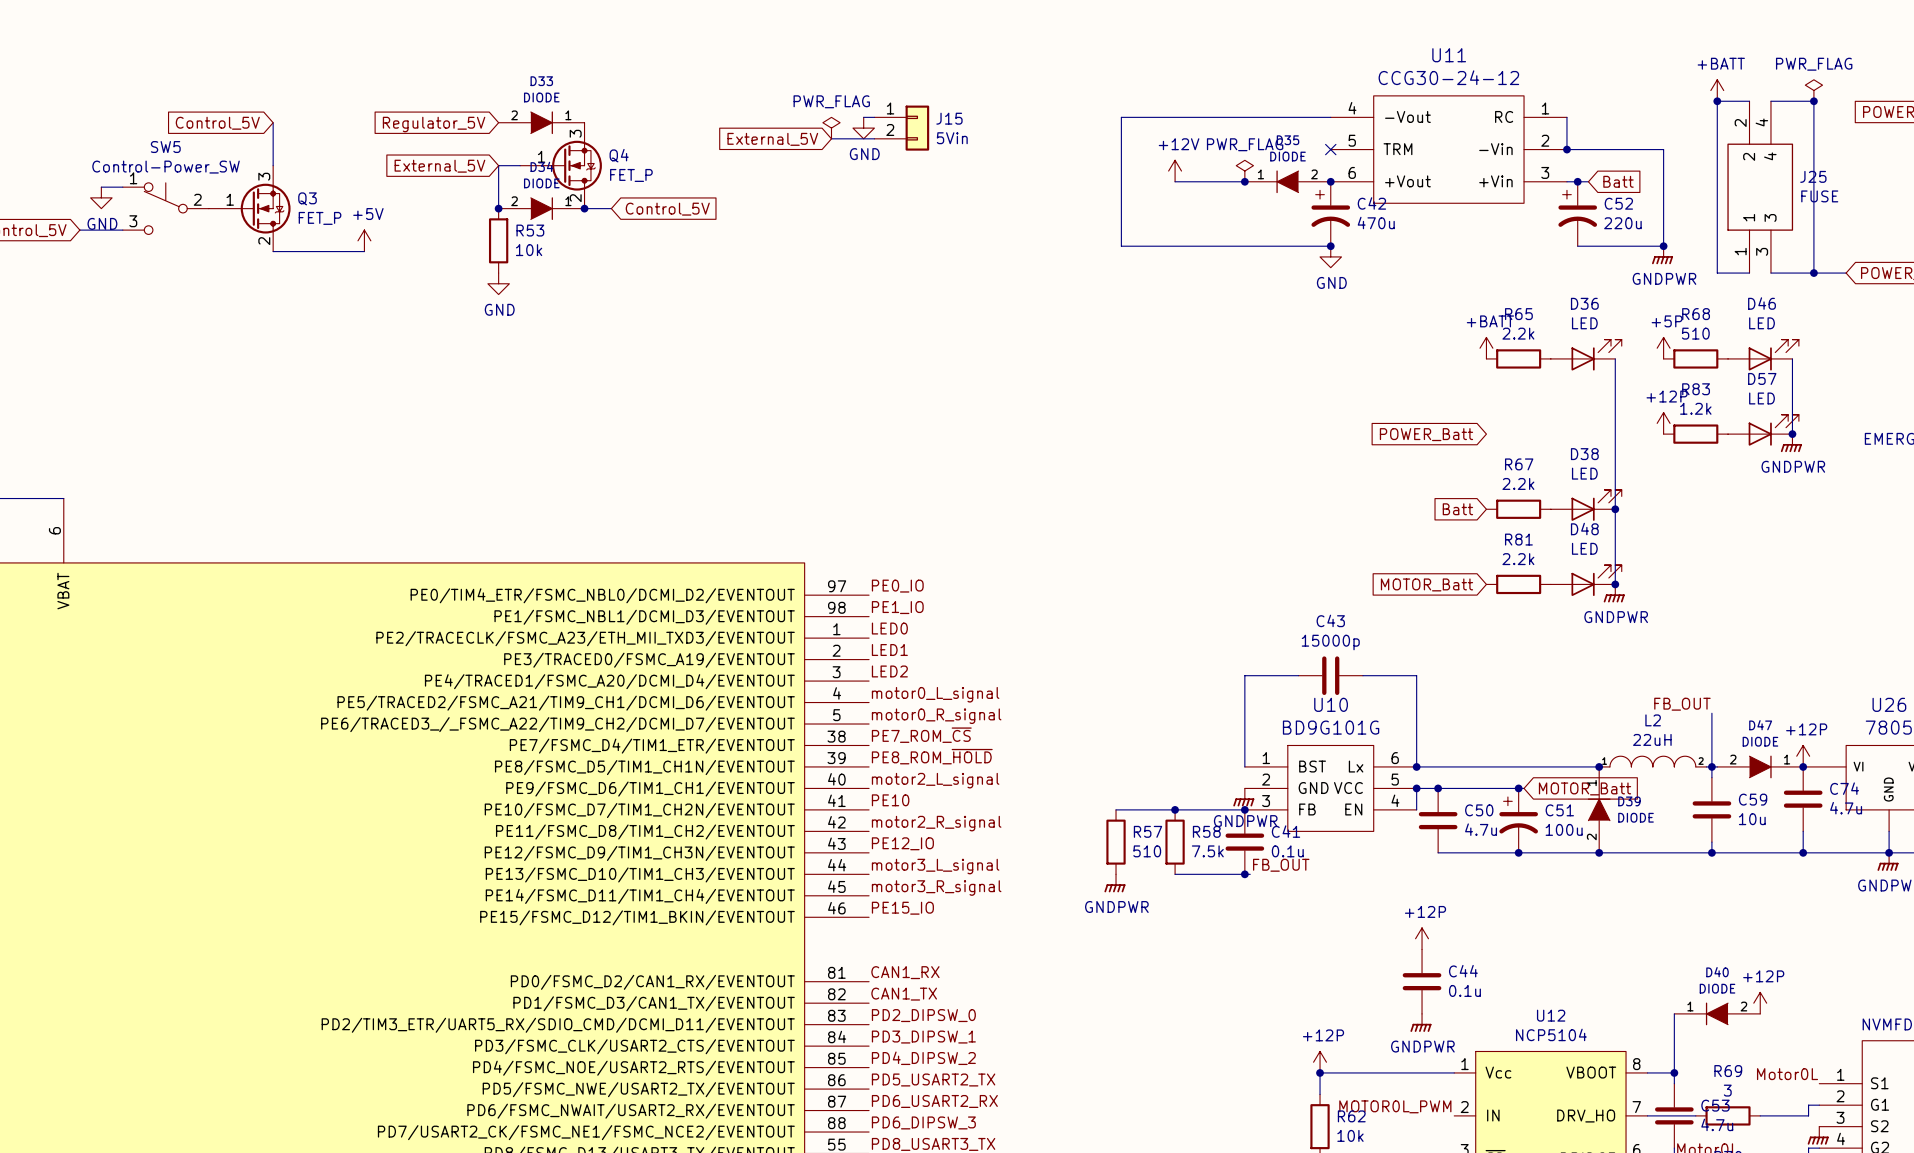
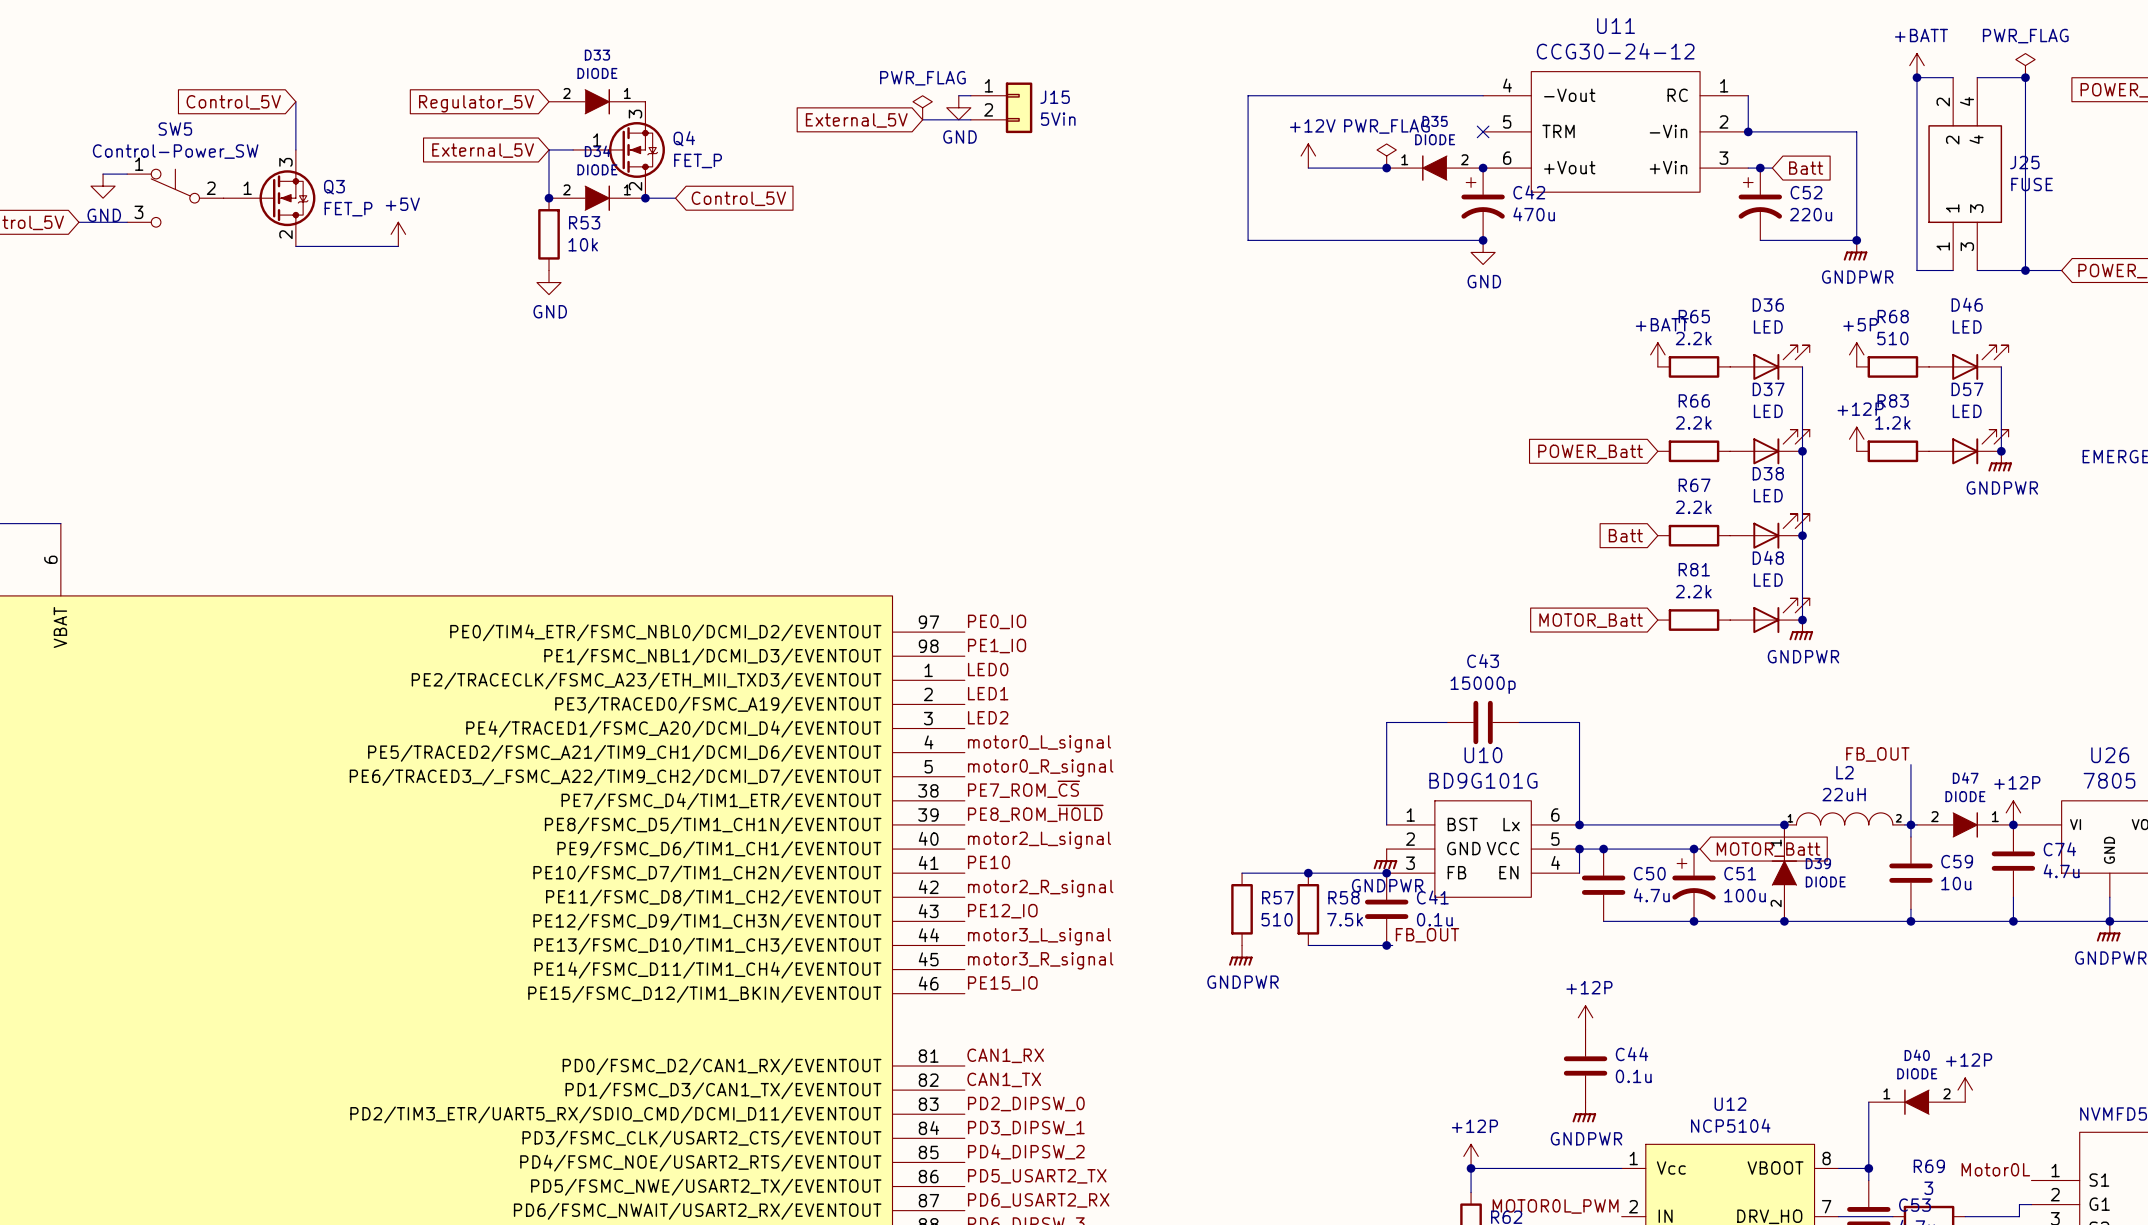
D37: none -> LED (1769, 446)
R66: none -> 2.2k (1694, 451)
junction: none -> (1802, 451)

